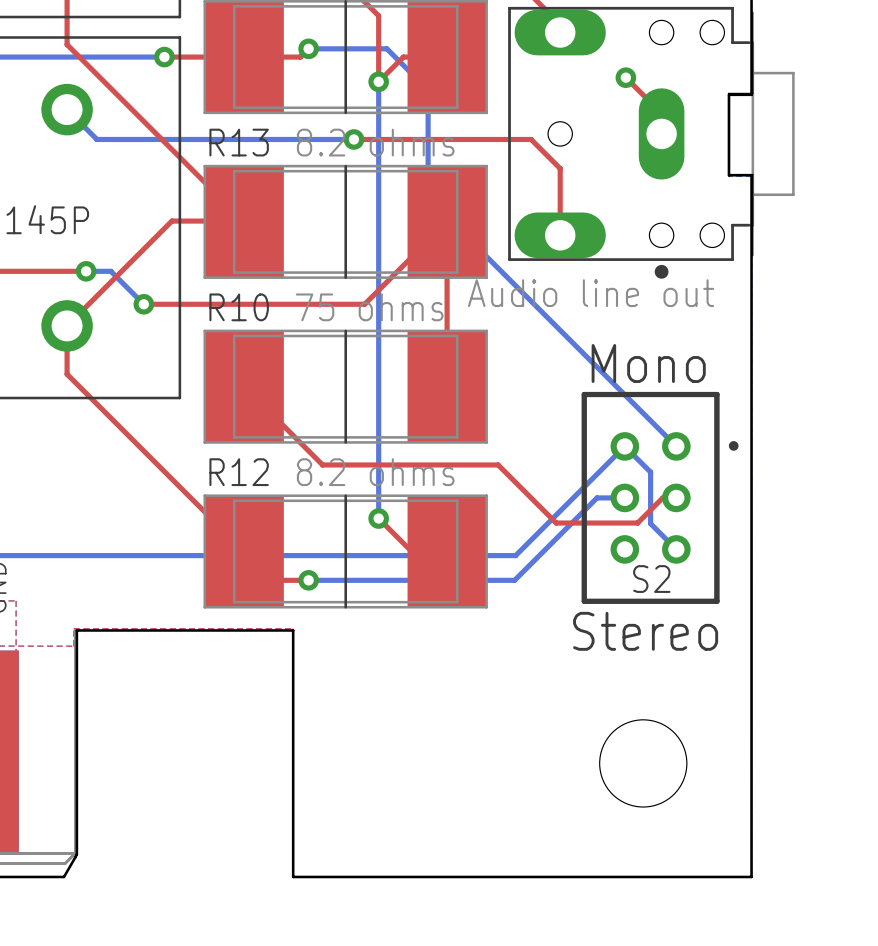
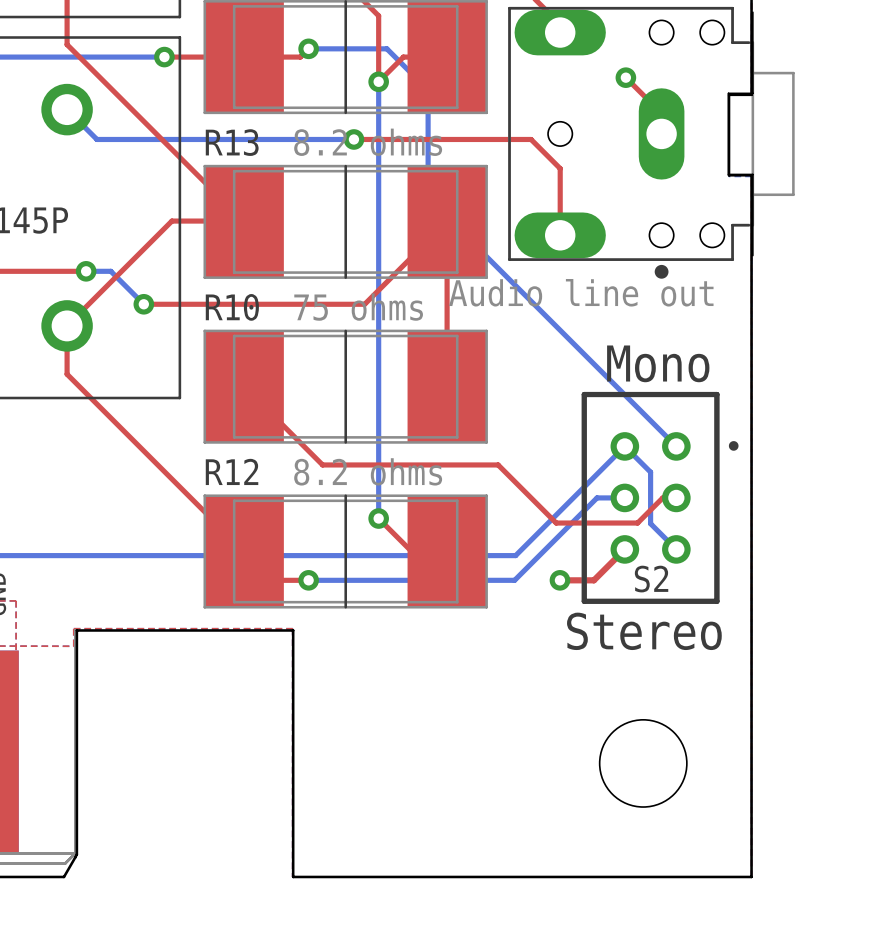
top track: none -> (624, 549) (593, 580) (559, 580)
via: none -> (559, 580)

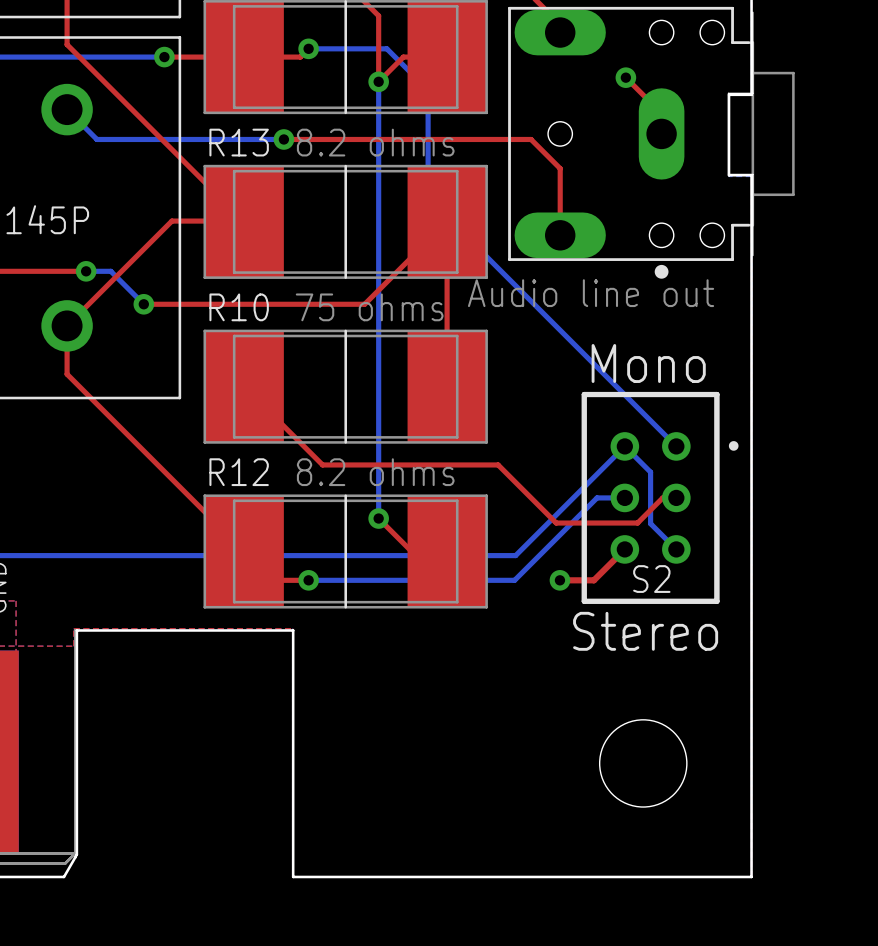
bottom track: (283, 139) (353, 139) -> none
top track: none -> (283, 139) (353, 139)
via position: (353, 139) -> (283, 139)

